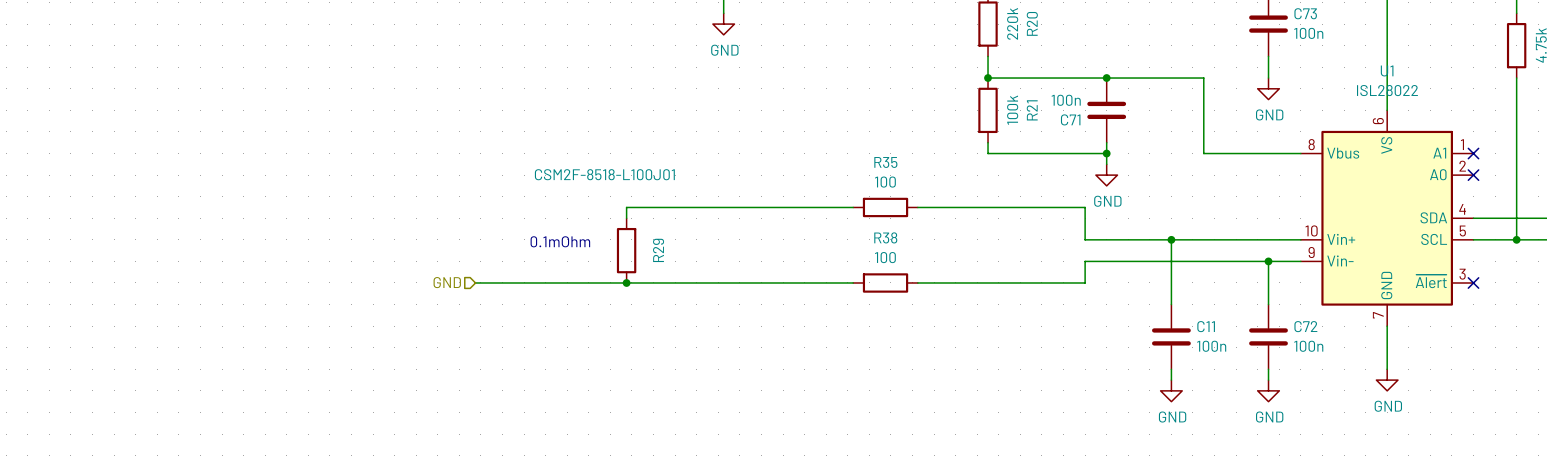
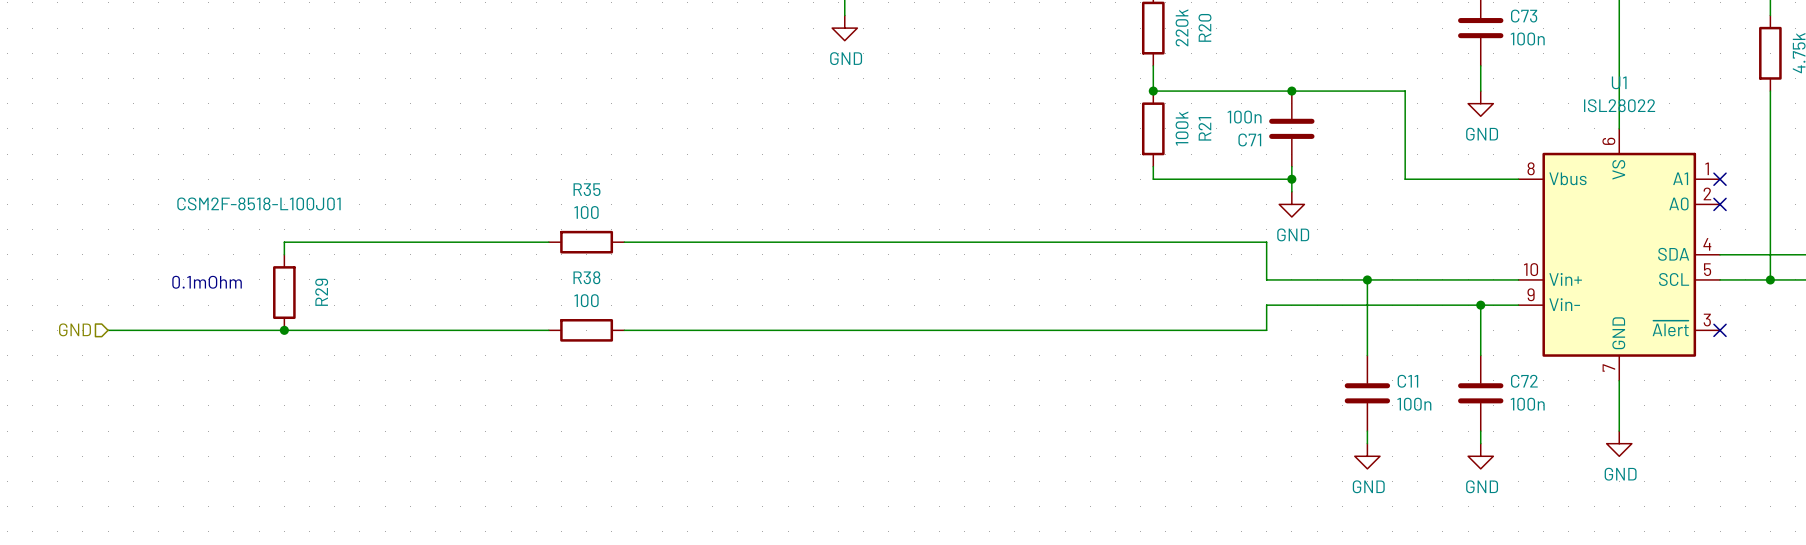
wire: none -> (548, 242) (284, 242) (284, 254)
wire: (626, 207) (626, 218) -> (731, 242) (624, 242)
wire: none -> (995, 242) (1071, 242)
R35 position: (885, 207) -> (586, 242)
text: none -> 0.1mOhm (207, 282)
text: 0.1mOhm (560, 241) -> none
R29 position: (626, 250) -> (284, 292)
hierarchical label: none -> GND (75, 329)
wire: none -> (108, 330) (548, 330)
junction: none -> (284, 330)
hierarchical label: GND (447, 282) -> none
wire: (475, 282) (534, 282) -> none
junction: (626, 282) -> none
wire: none -> (995, 330) (1071, 330)
R38 position: (885, 282) -> (586, 330)

